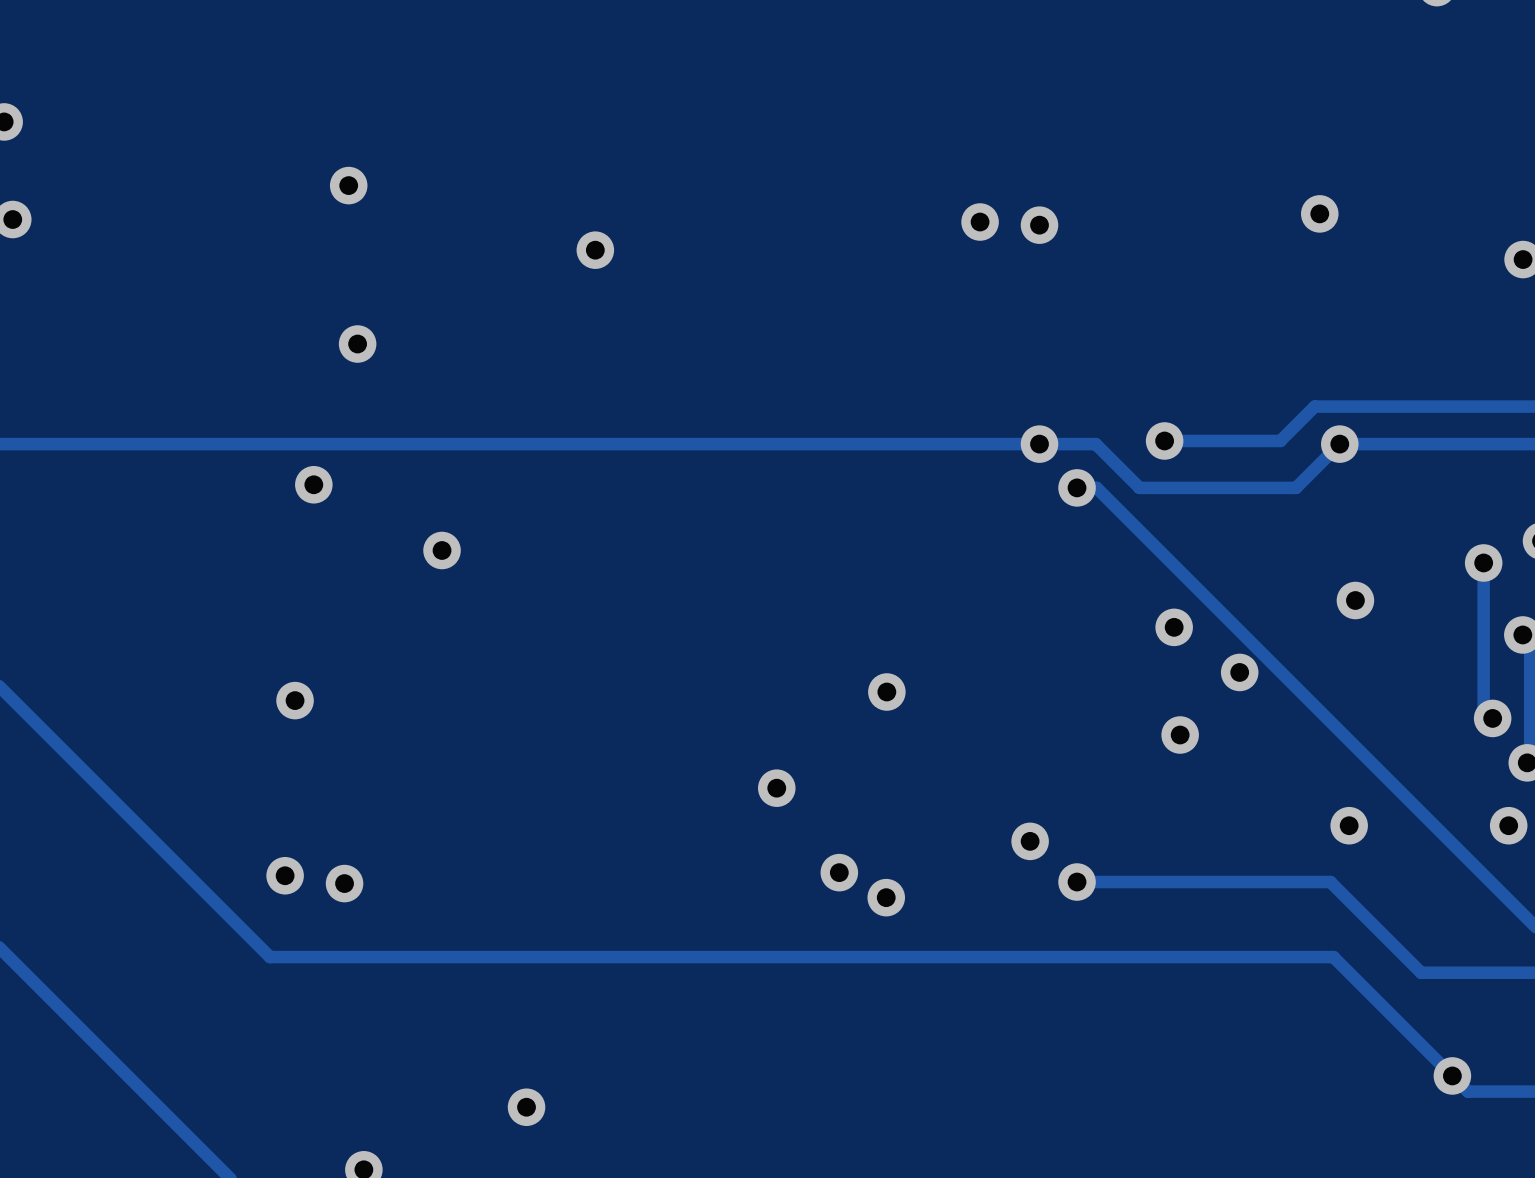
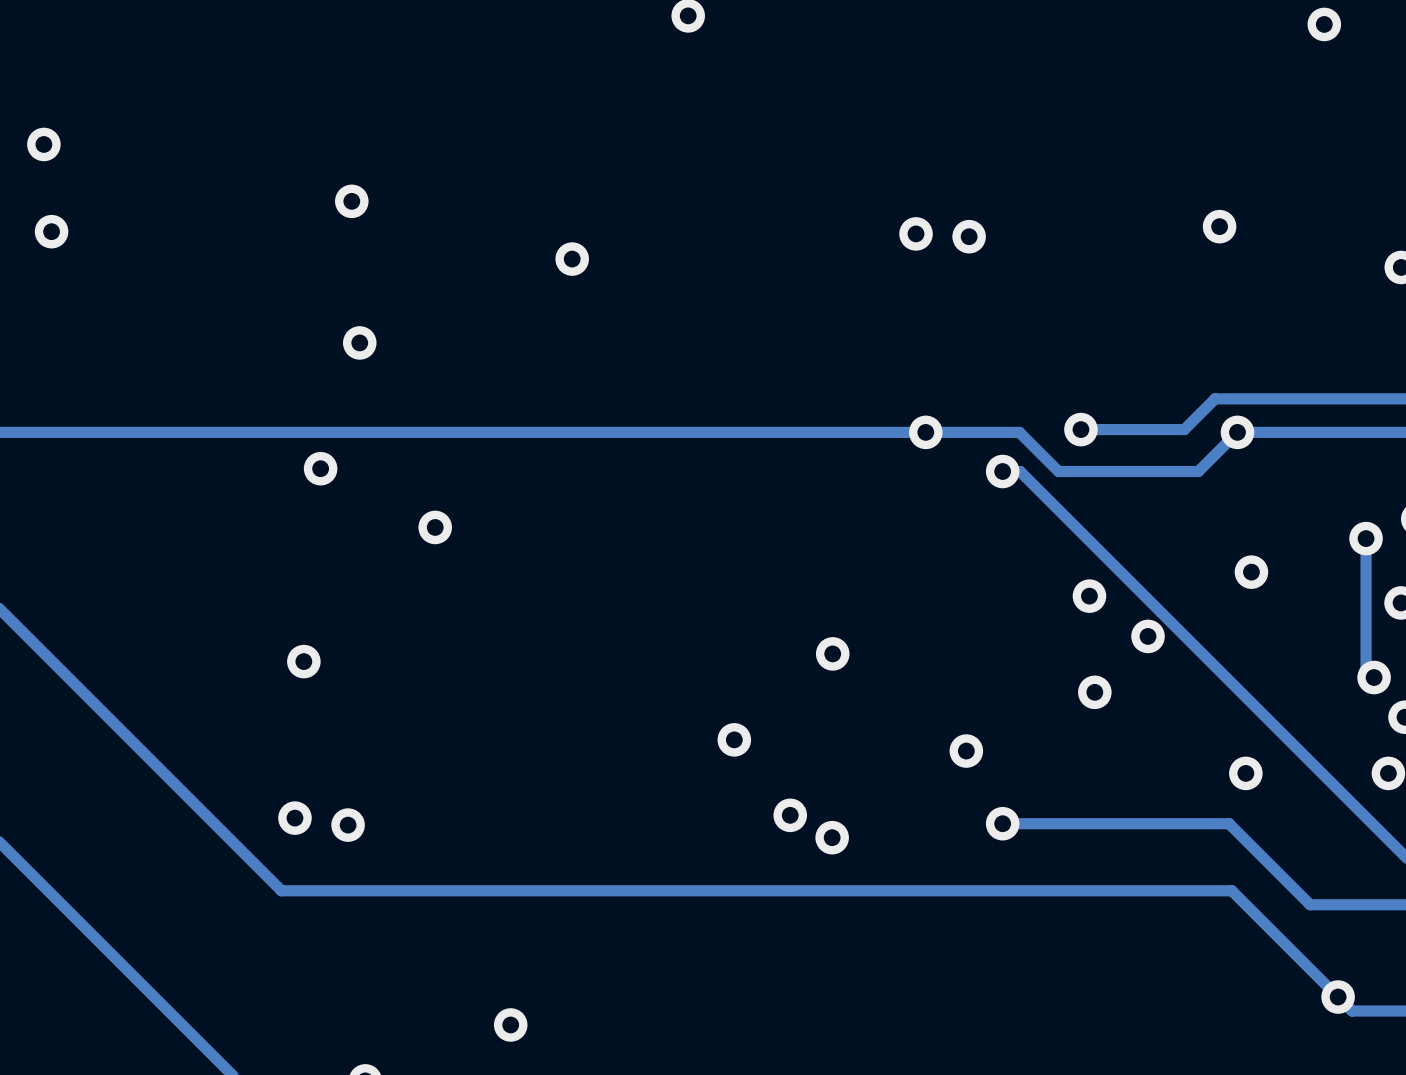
via position: (1039, 444) -> (925, 432)
via position: (1030, 841) -> (966, 751)

